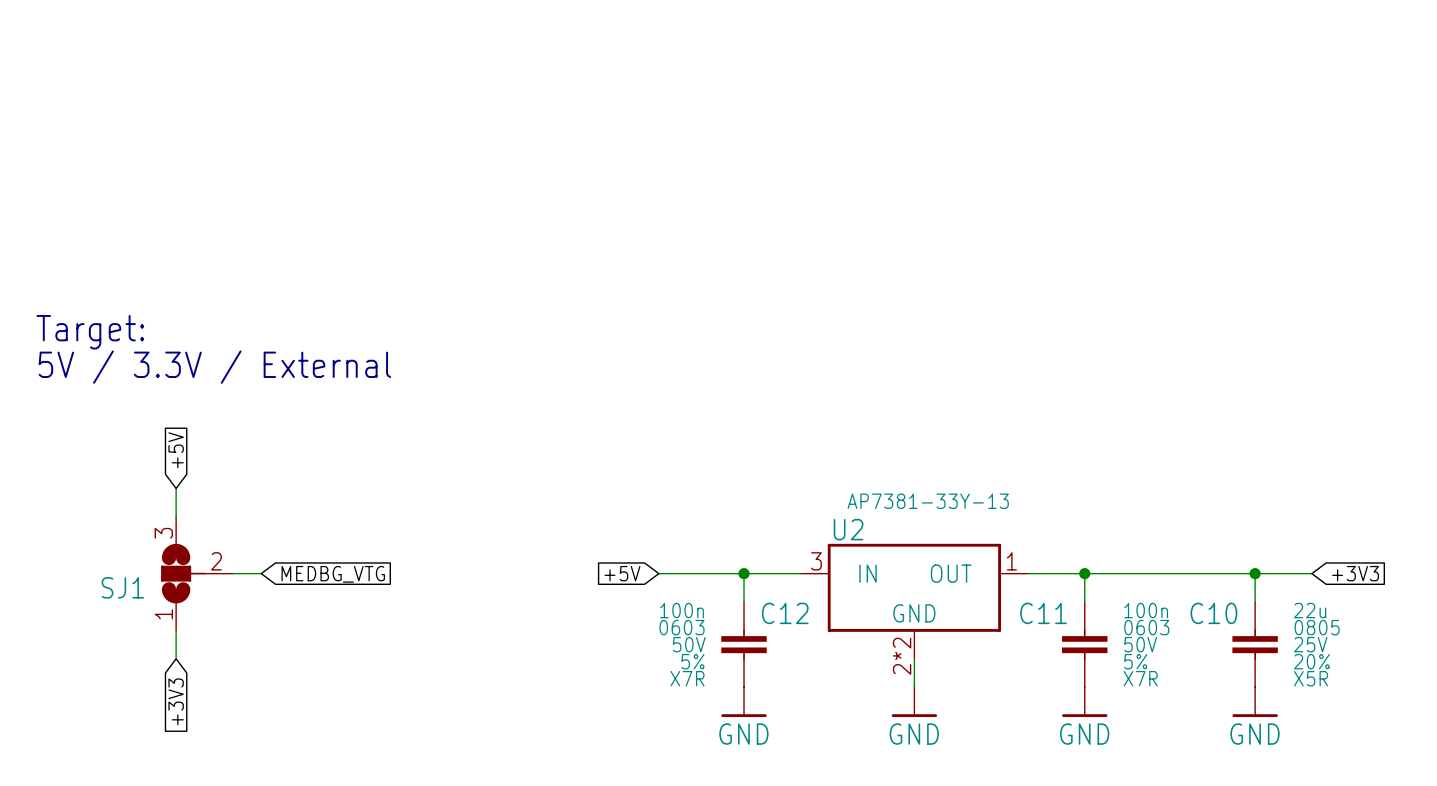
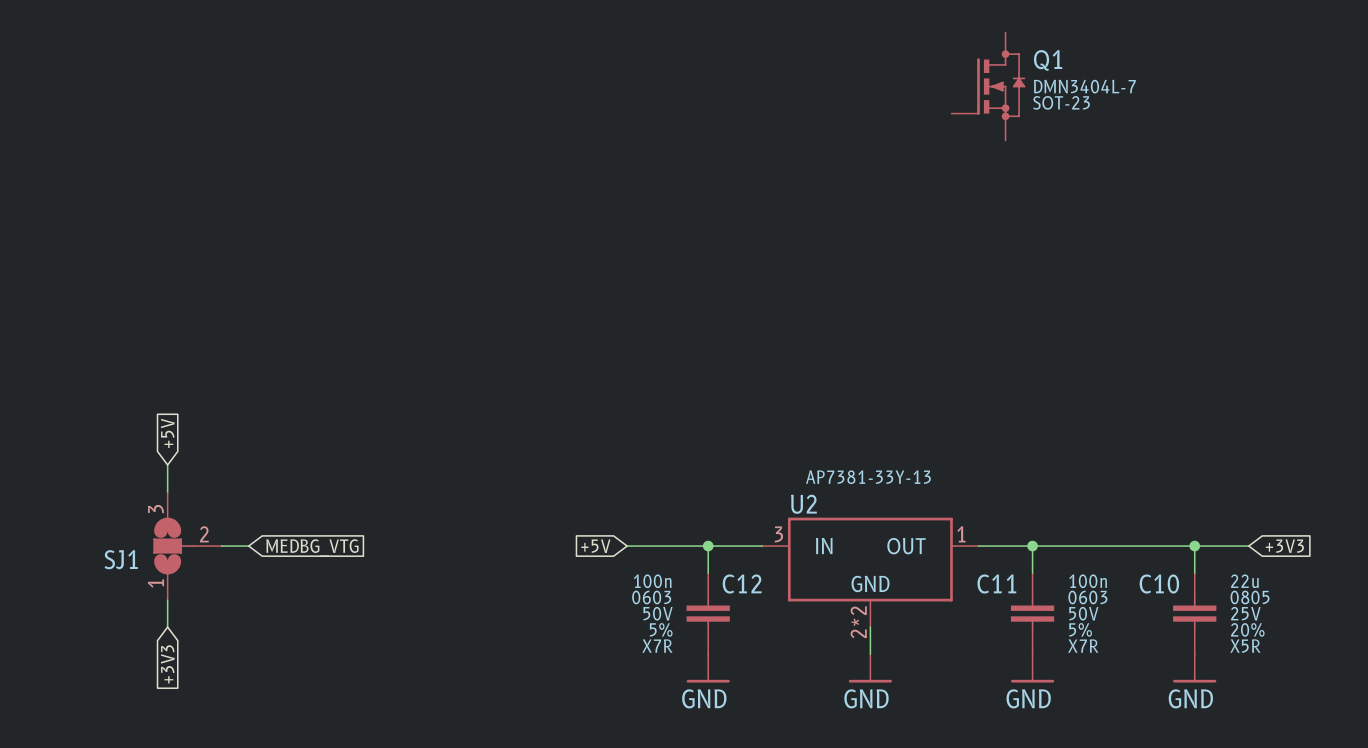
Q1: none -> (988, 86)
text: Target: (90, 332) -> none
text: 5V / 3.3V / External (214, 367) -> none

